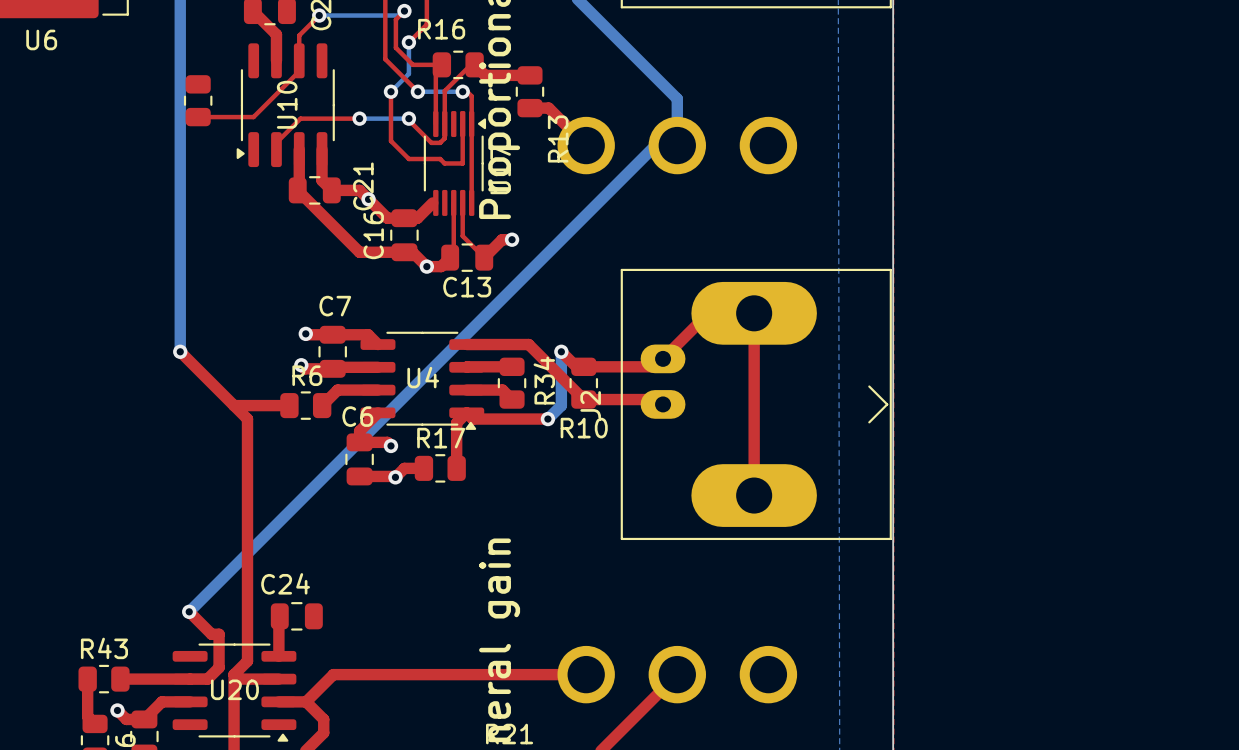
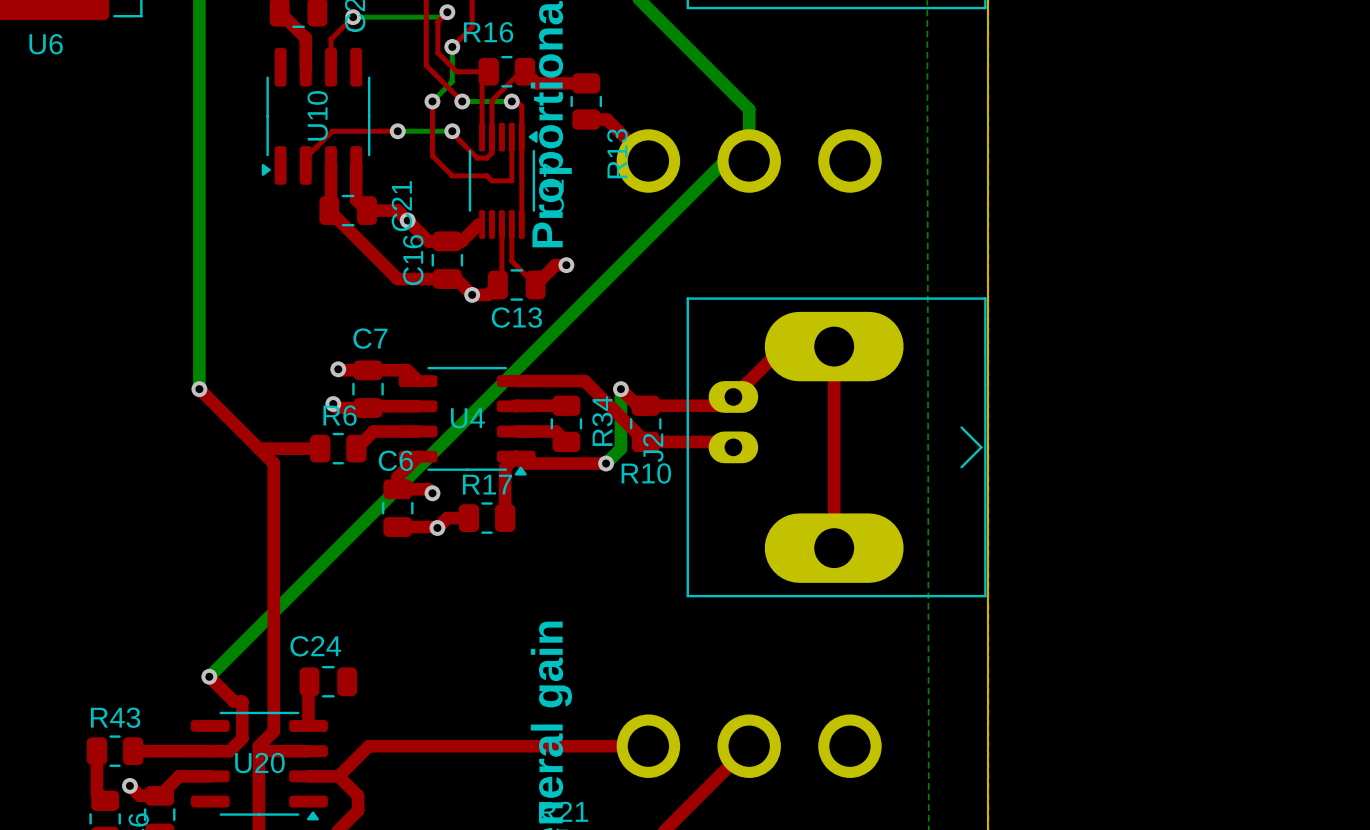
top track: (299, 60) (299, 71) (253, 117) (198, 117) -> none
part: (198, 100) -> none

